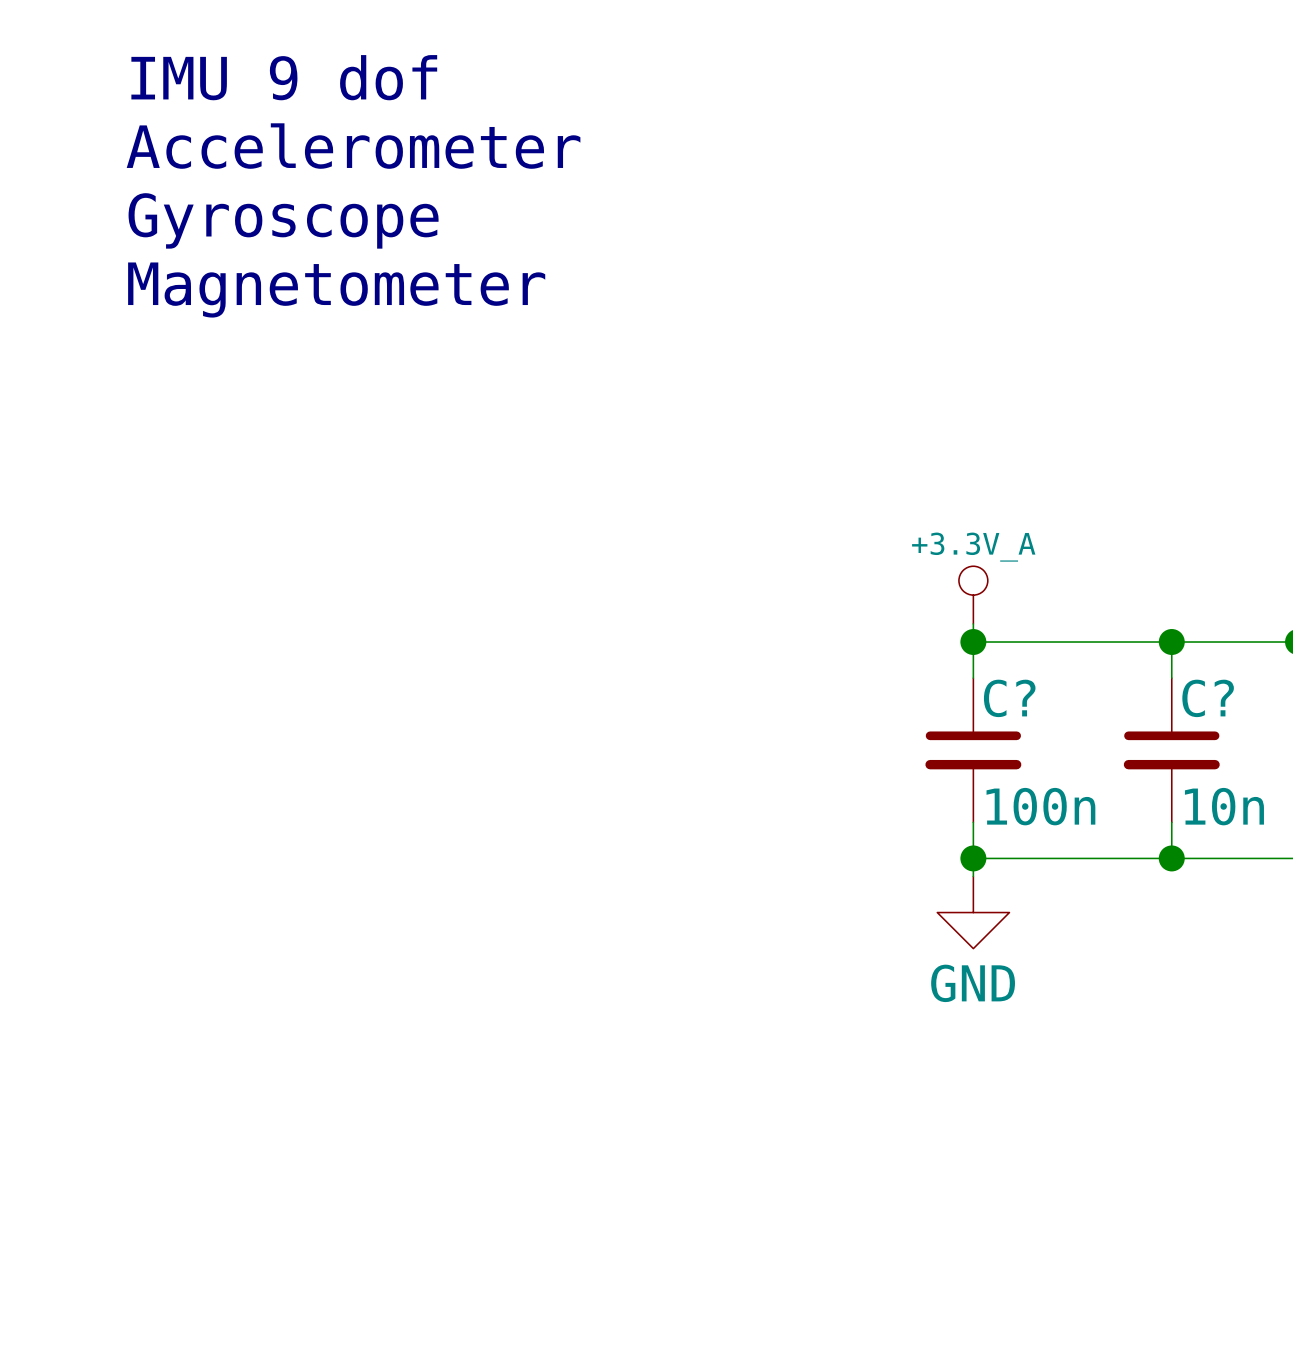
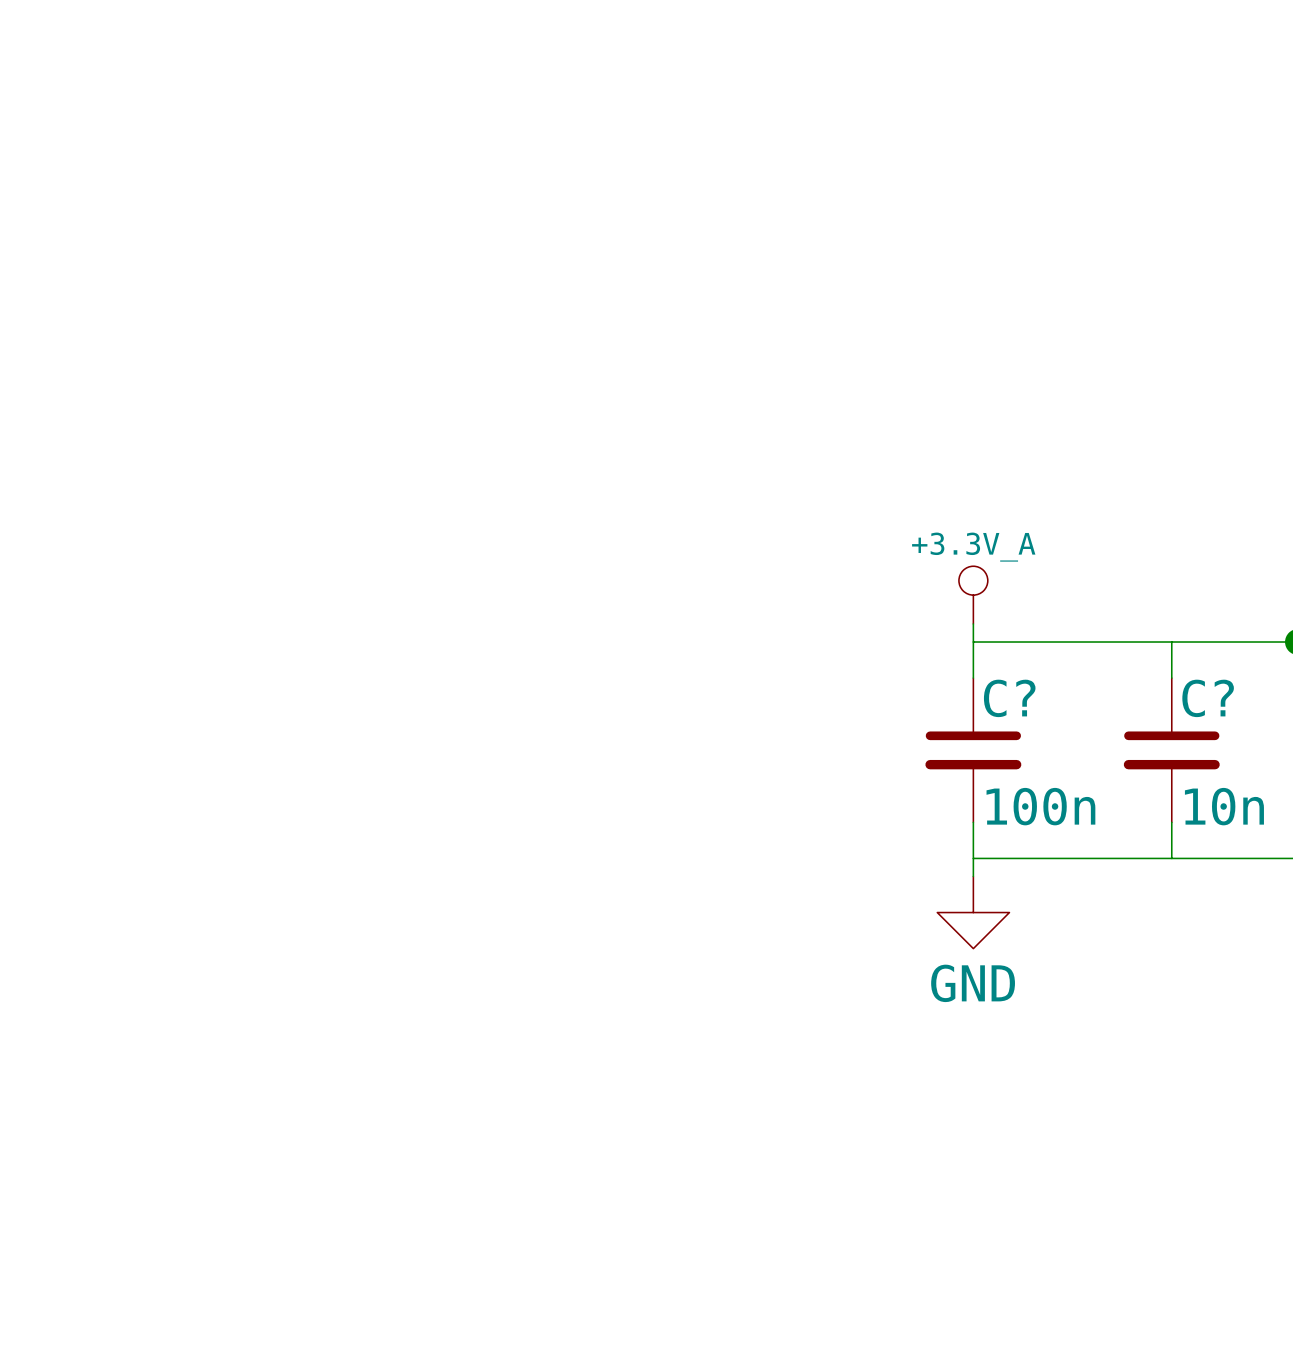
text: IMU 9 dof (284, 77) -> none
text: Accelerometer (353, 146) -> none
text: Gyroscope (283, 220) -> none
text: Magnetometer (336, 290) -> none
junction: (973, 642) -> none
junction: (1171, 642) -> none
junction: (973, 858) -> none
junction: (1171, 858) -> none

